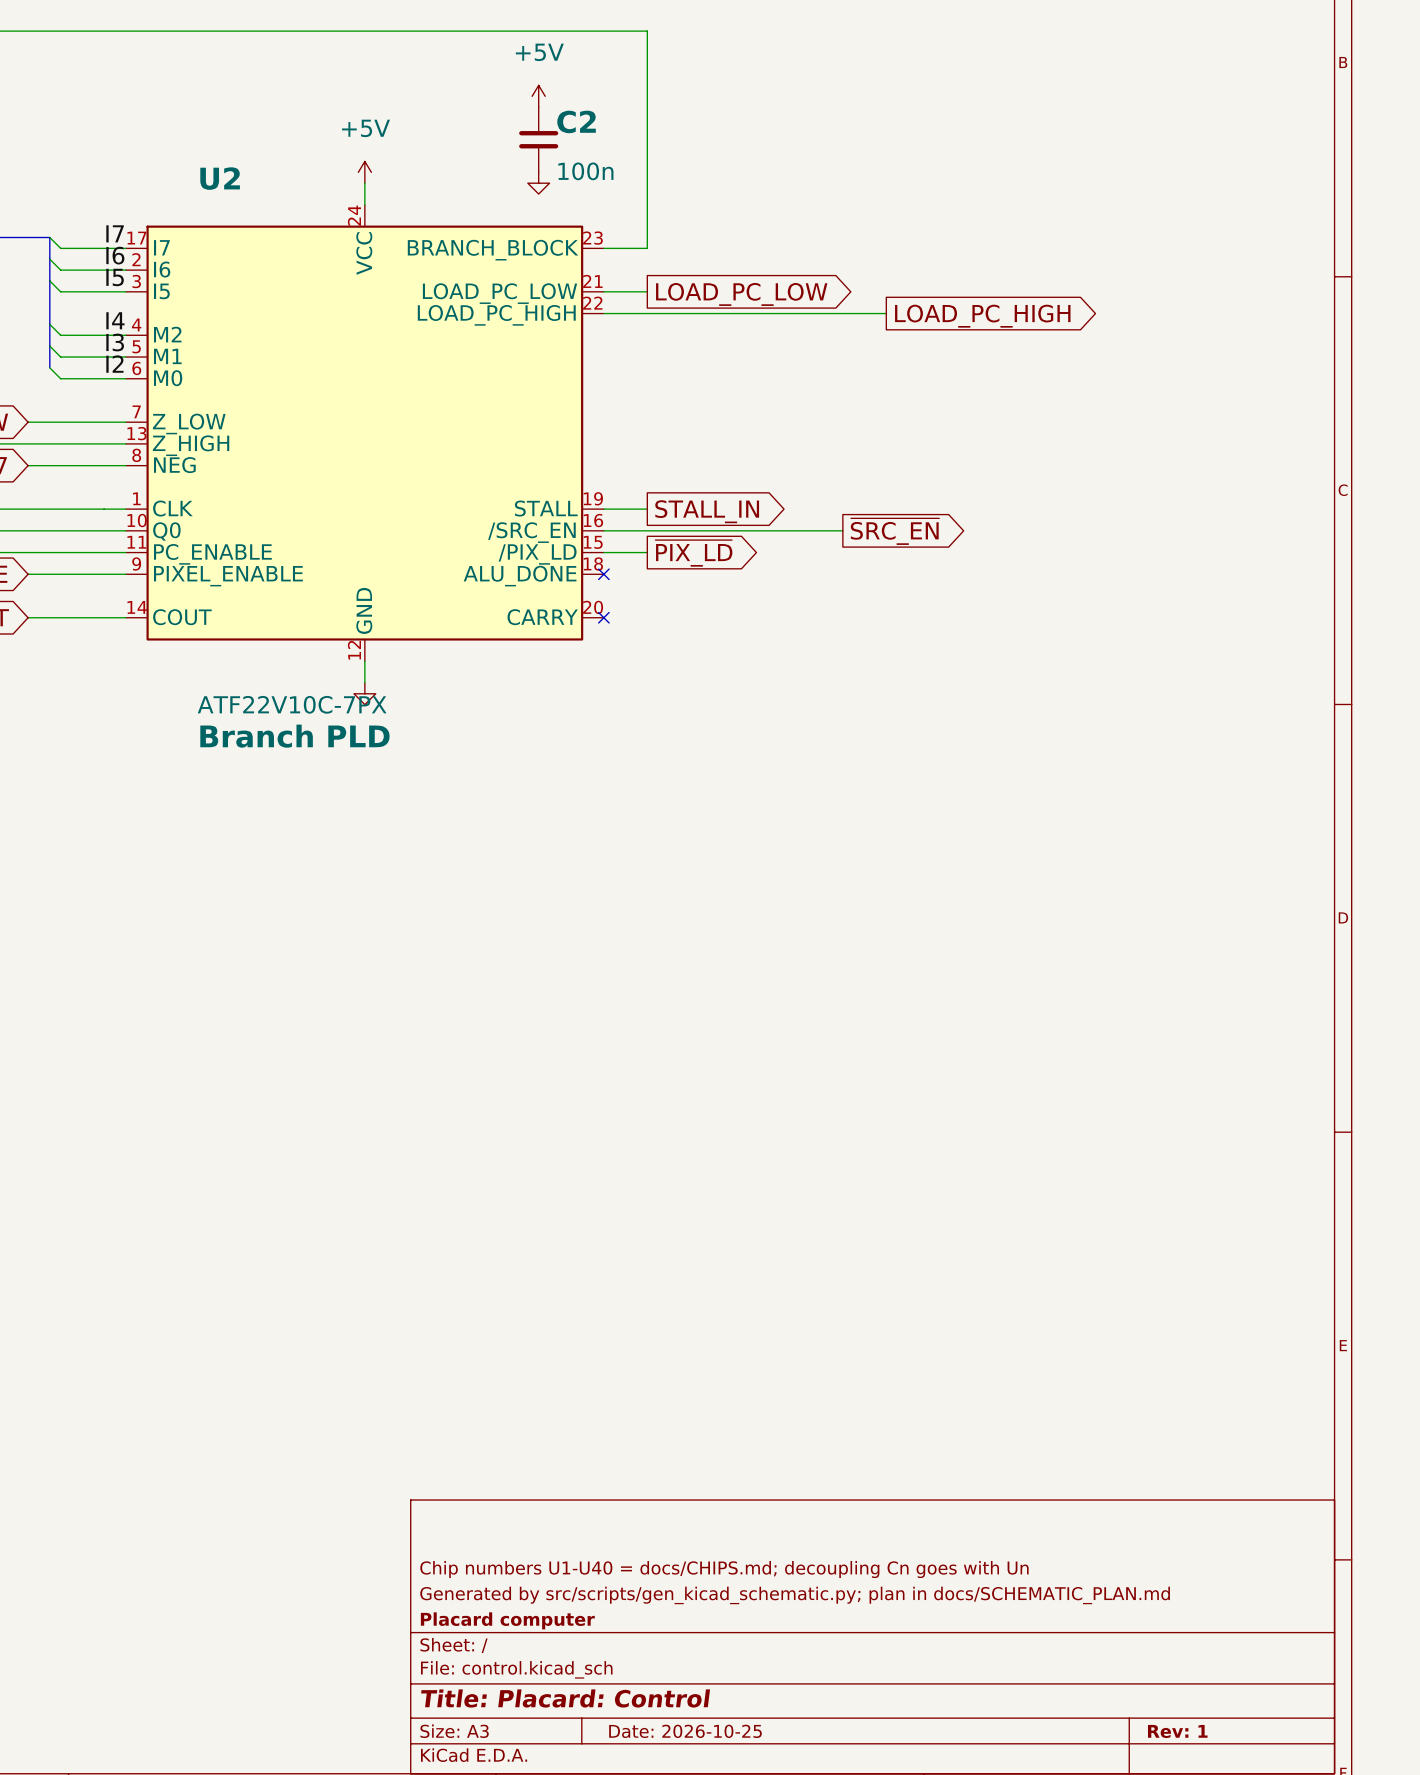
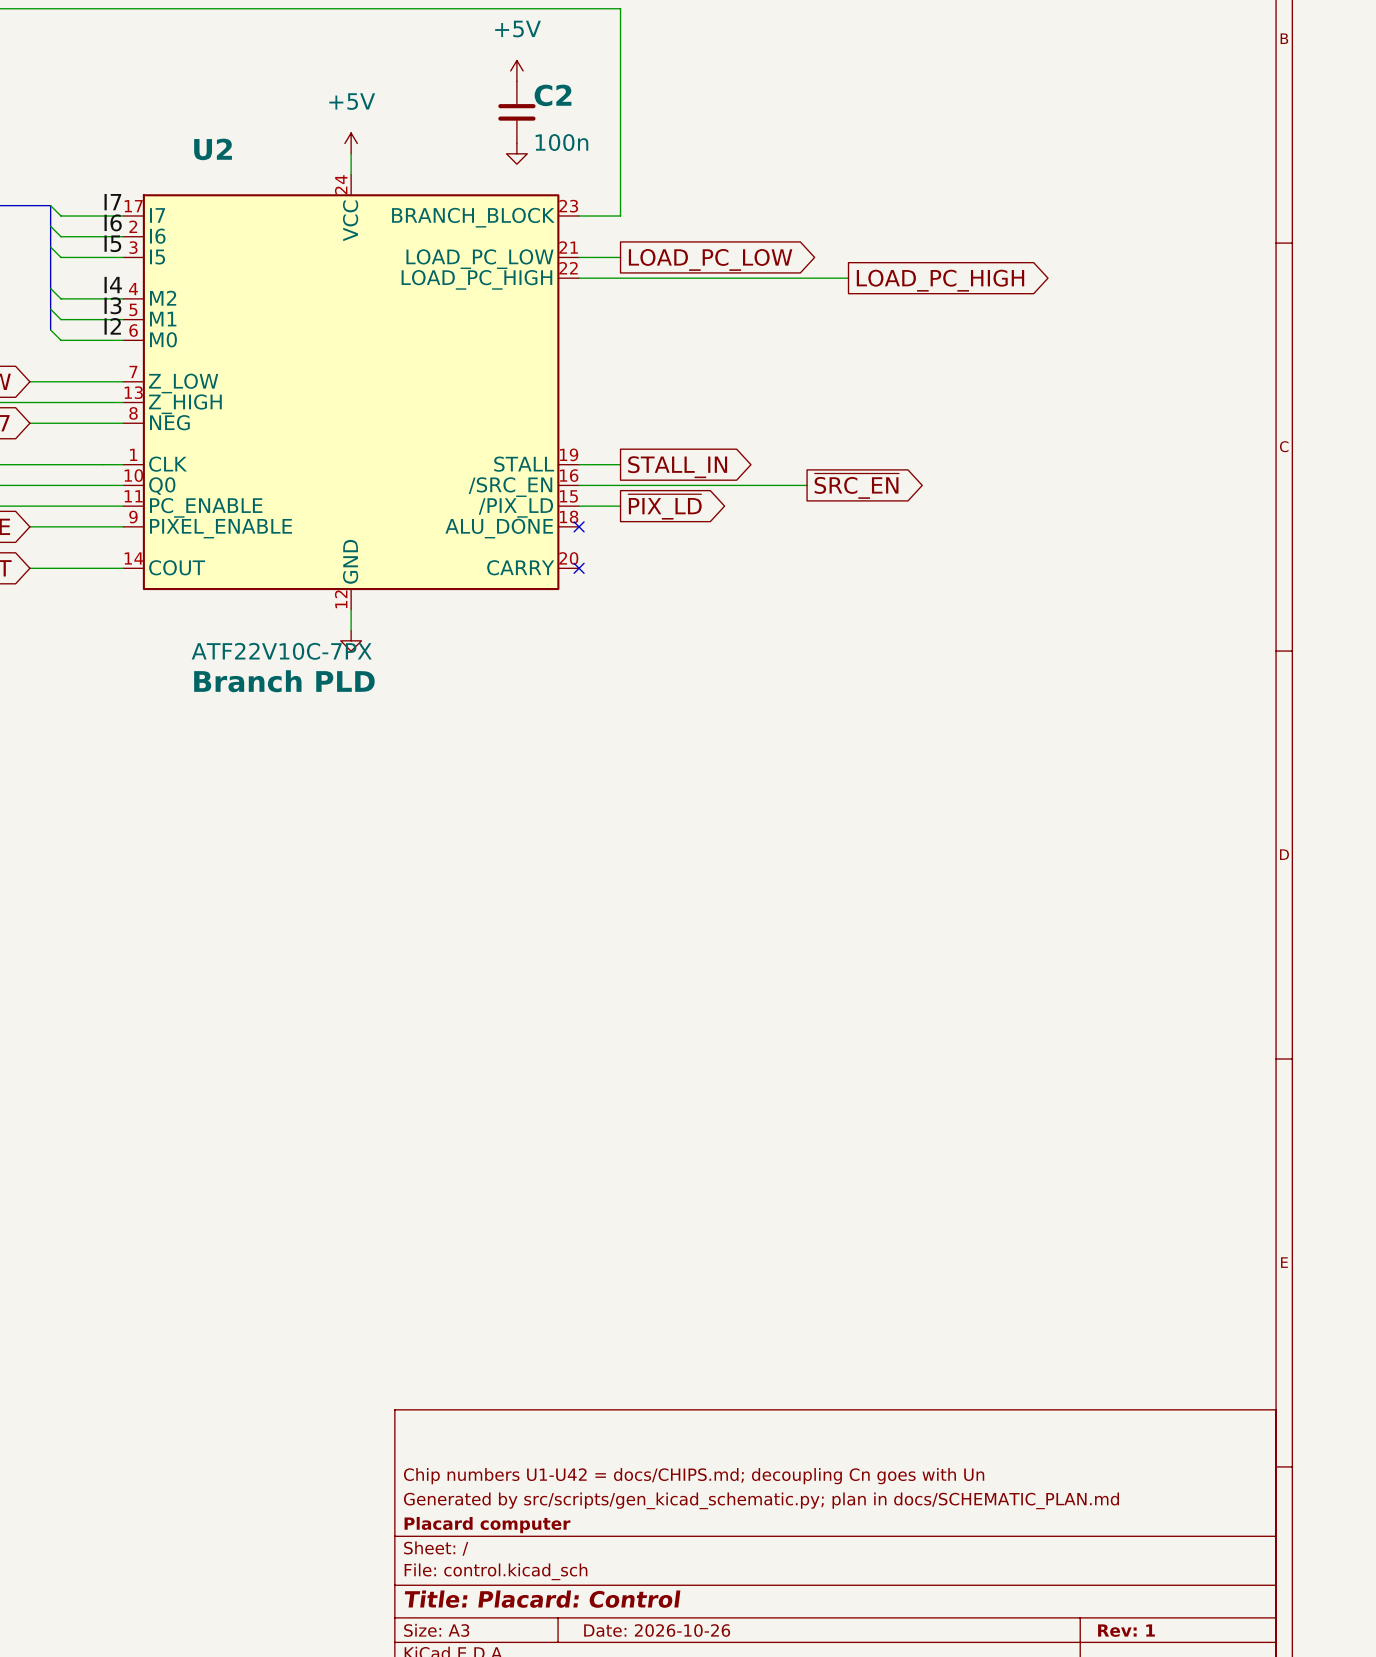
title block: Chip numbers U1-U40 = docs/CHIPS.md; decoupling Cn goes with Un (724, 1569) -> Chip numbers U1-U42 = docs/CHIPS.md; decoupling Cn goes with Un (694, 1476)
title block: Date: 2026-10-25 (685, 1731) -> Date: 2026-10-26 (657, 1630)

